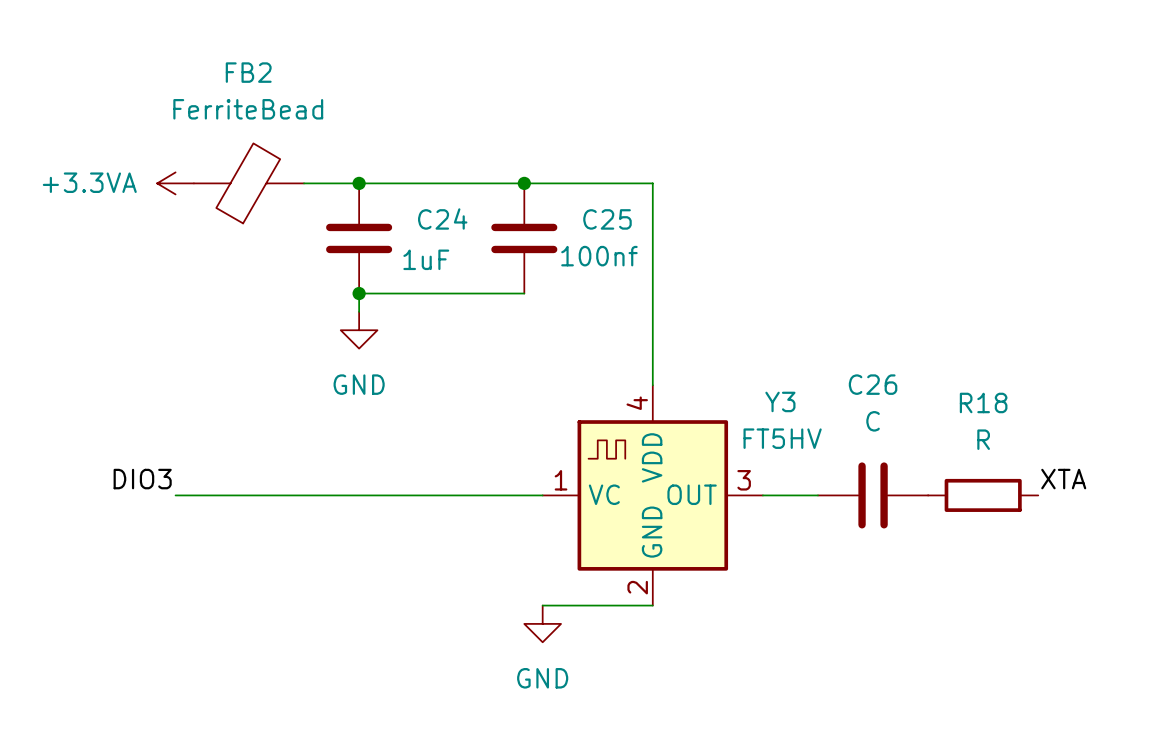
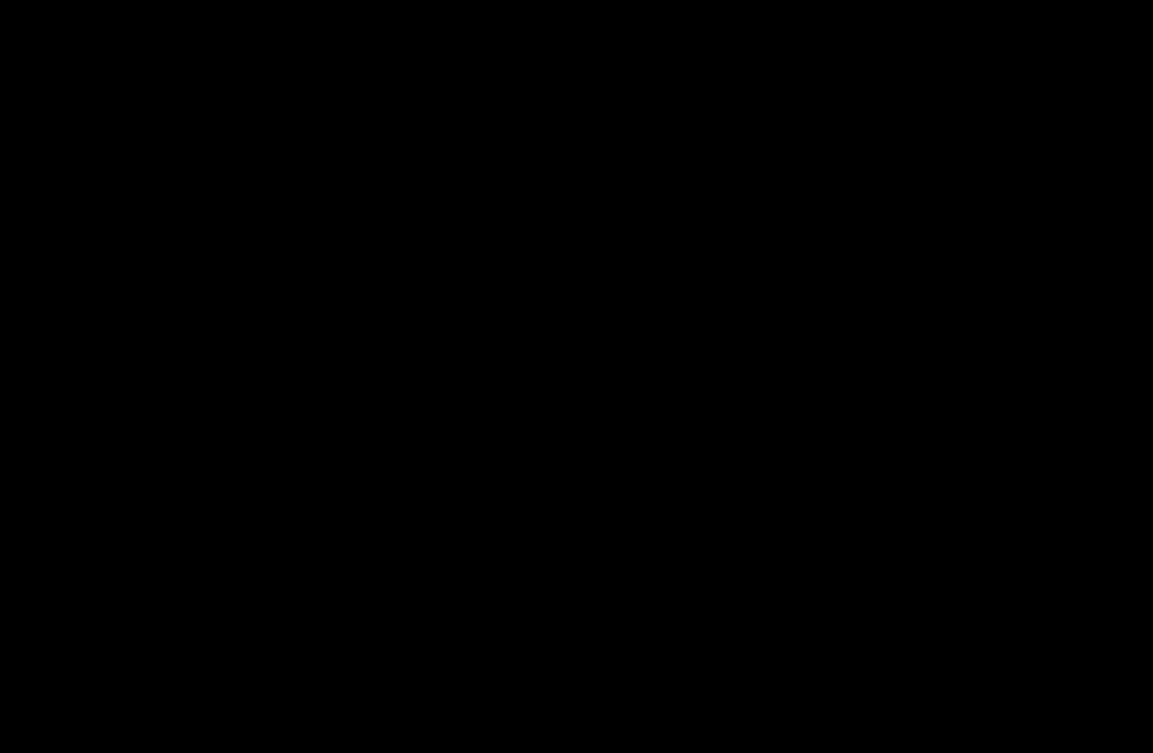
power symbol: +3.3VA (175, 183) -> none
FB2: FerriteBead (248, 183) -> none
wire: (304, 183) (652, 183) (652, 385) -> none
junction: (359, 183) -> none
junction: (524, 183) -> none
C24: 1uF (359, 238) -> none
C25: 100nf (524, 238) -> none
junction: (359, 293) -> none
wire: (524, 293) (359, 293) (359, 311) -> none
power symbol: GND (359, 330) -> none
label: DIO3 (142, 479) -> none
label: XTA (1063, 479) -> none
wire: (175, 495) (542, 495) -> none
Y3: FT5HV (652, 495) -> none
wire: (762, 495) (817, 495) -> none
C26: C (873, 495) -> none
R18: R (983, 495) -> none
wire: (542, 605) (652, 605) -> none
power symbol: GND (542, 623) -> none

